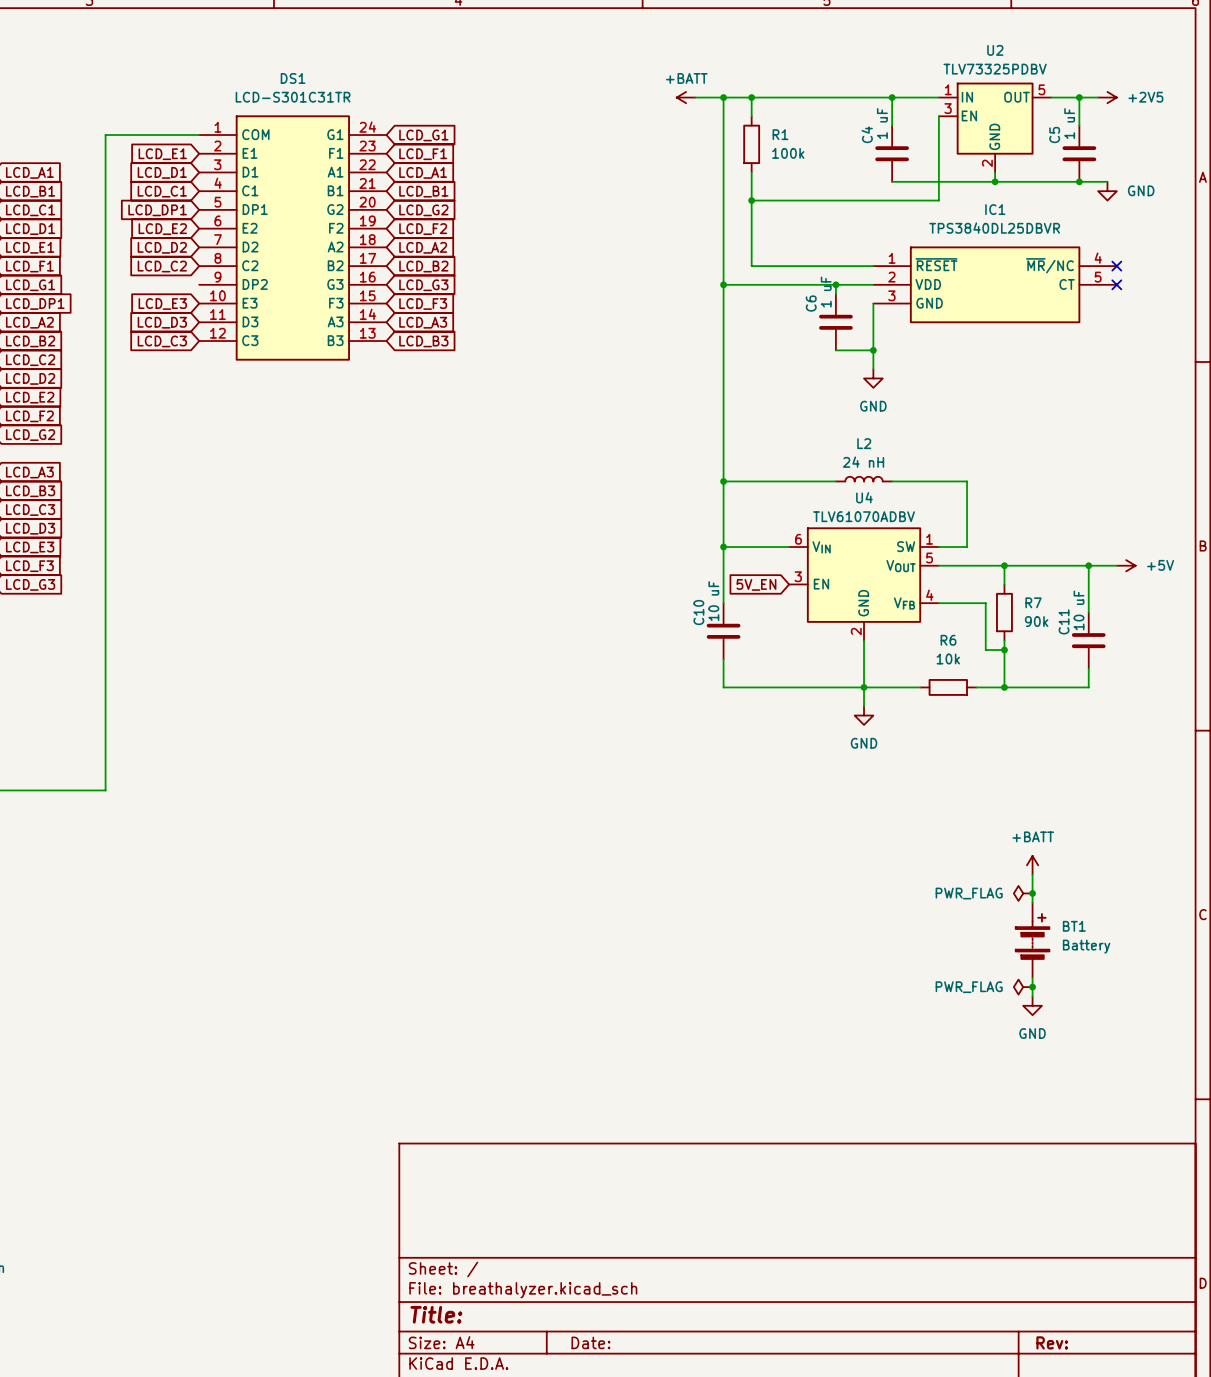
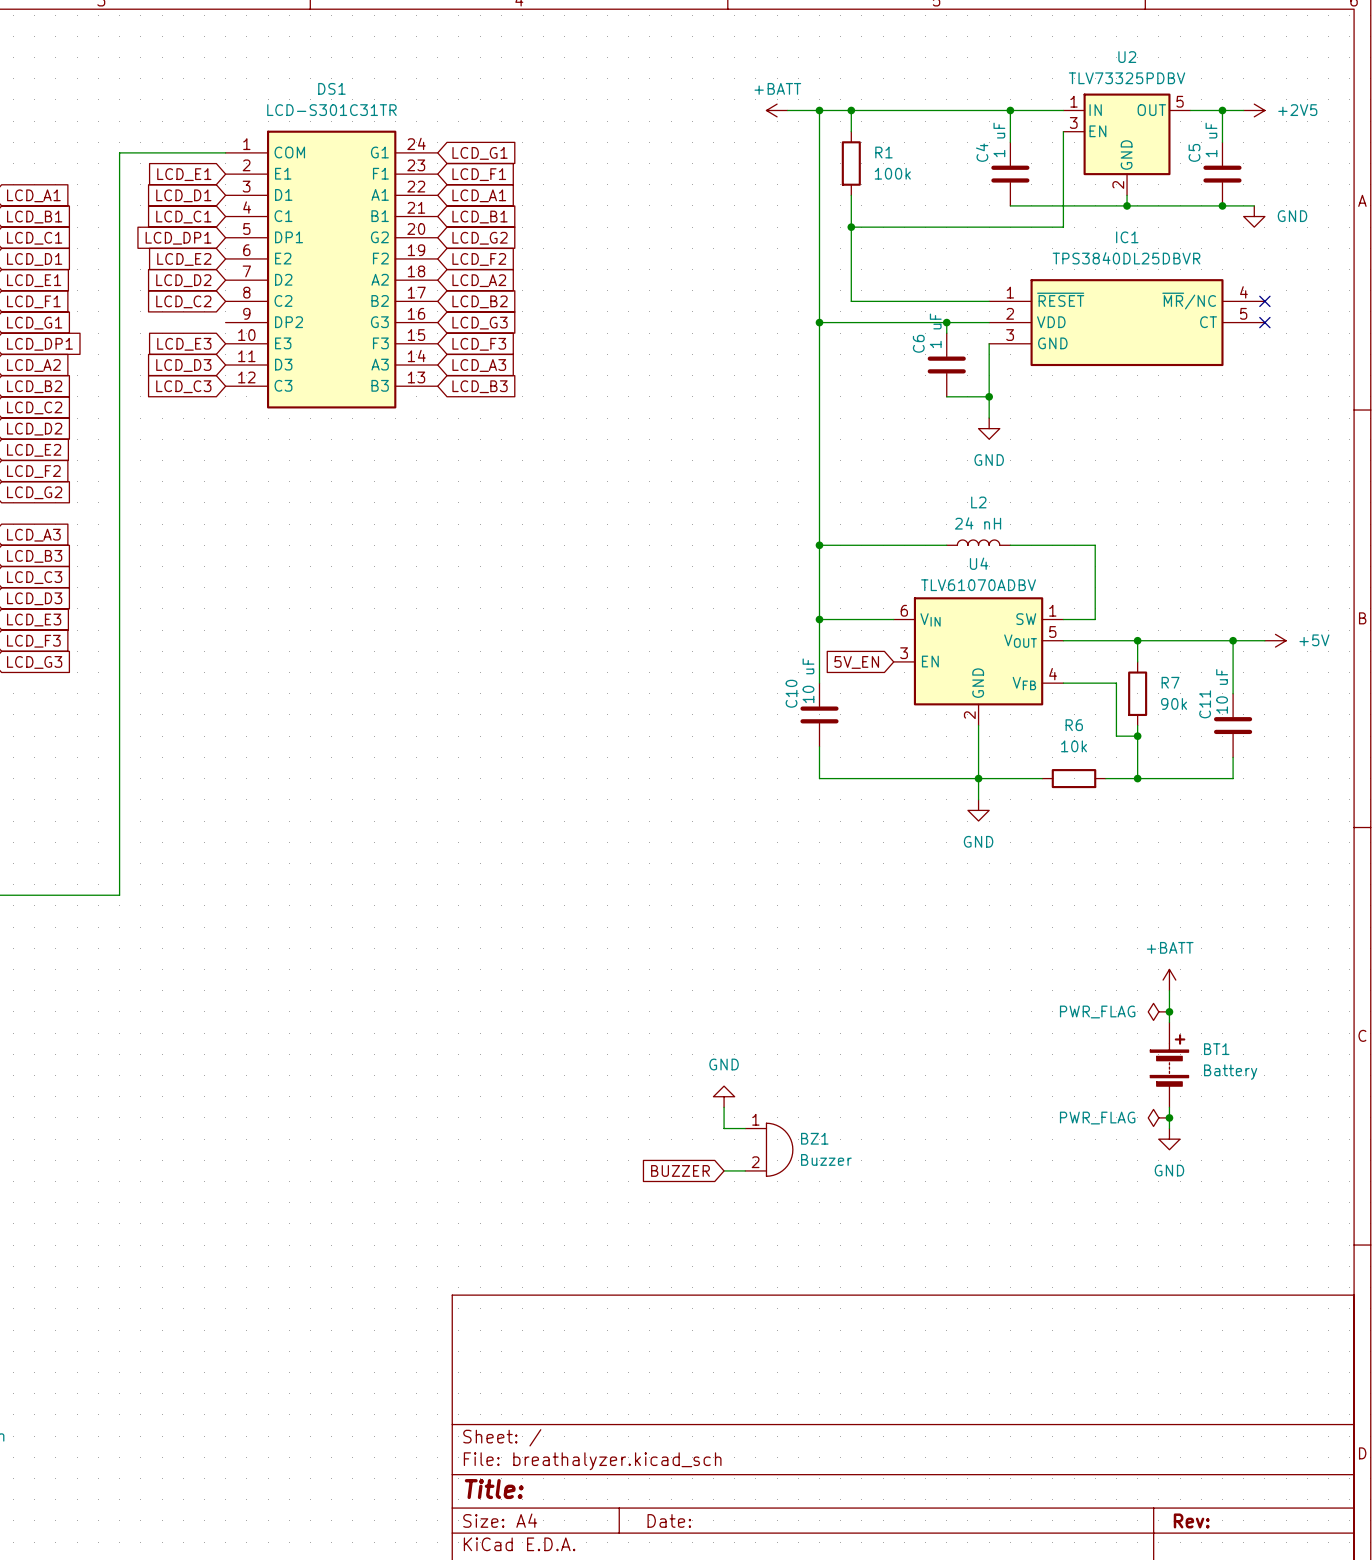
power symbol: none -> GND (724, 1096)
wire: none -> (724, 1107) (724, 1128) (745, 1128)
BZ1: none -> Buzzer (769, 1149)
global label: none -> BUZZER (680, 1170)
wire: none -> (724, 1170) (745, 1170)

